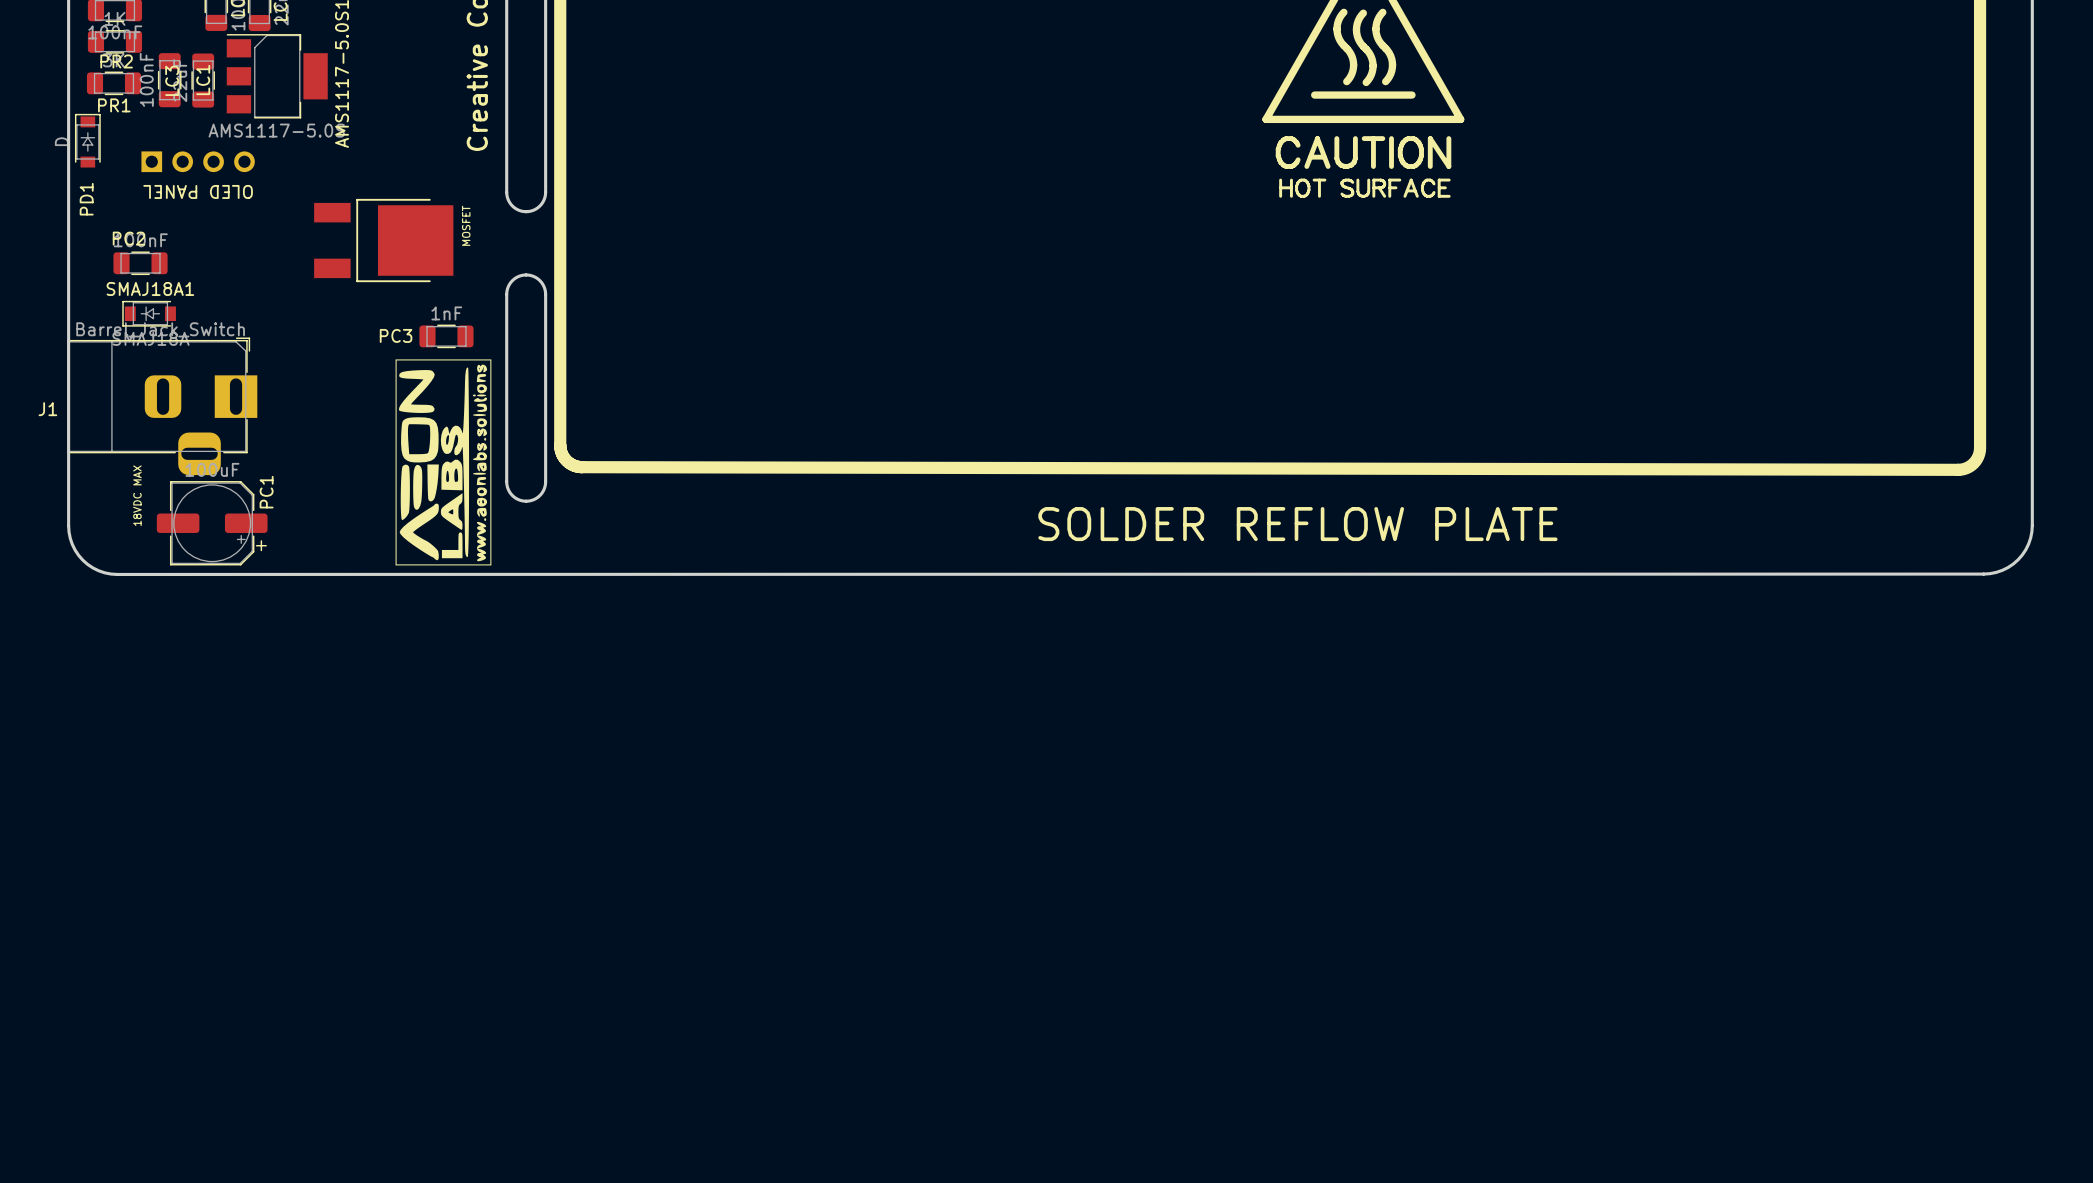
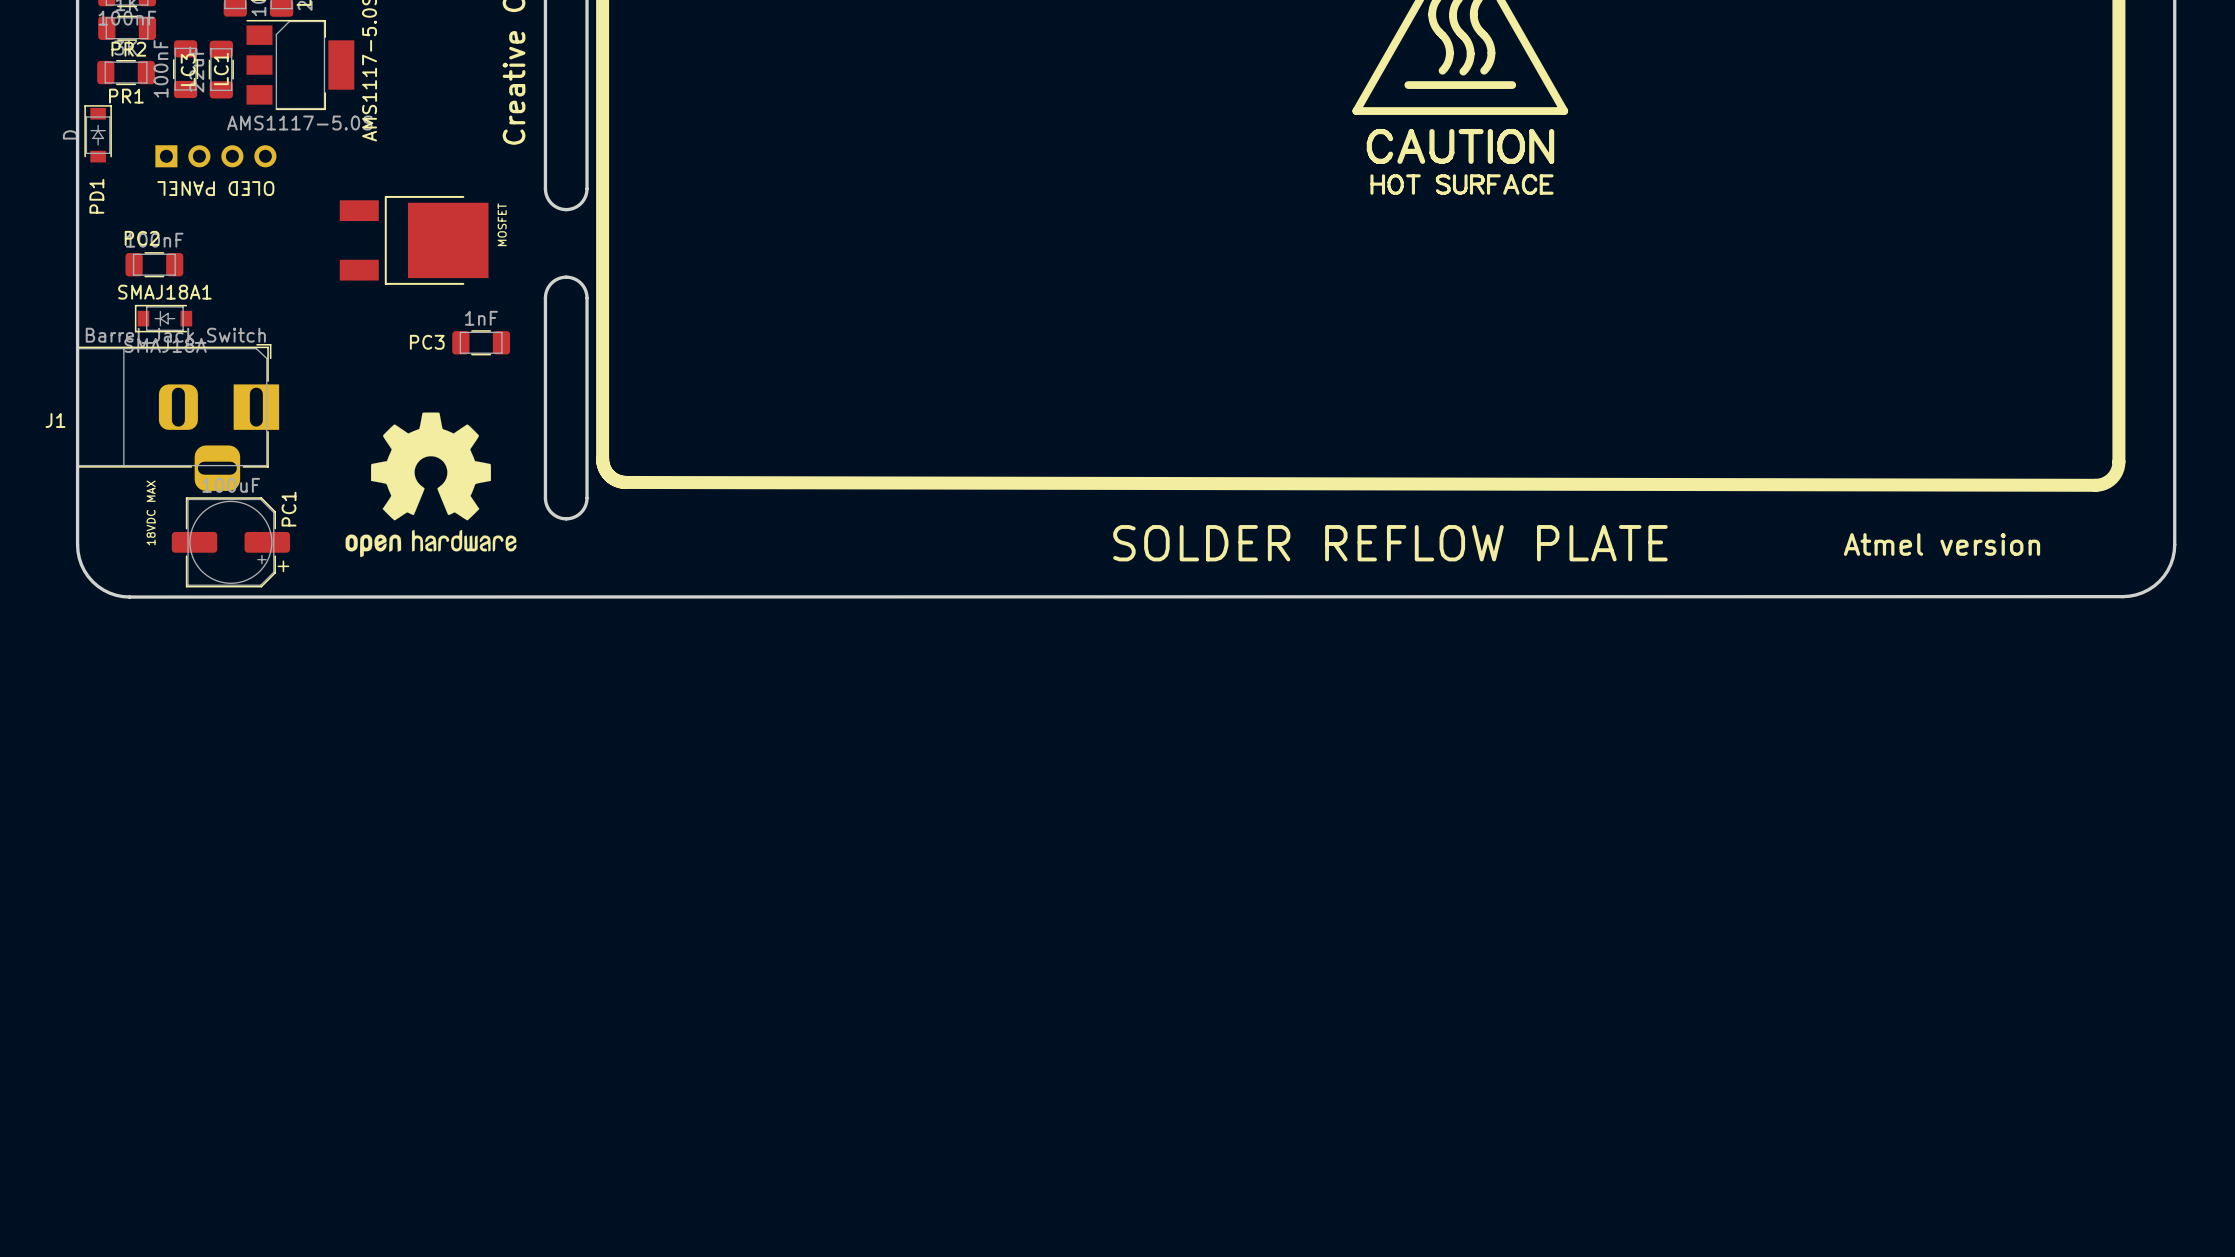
drawing: [395, 359, 492, 566] -> none
drawing: none -> [345, 412, 517, 558]
text: none -> Atmel version (1942, 544)

